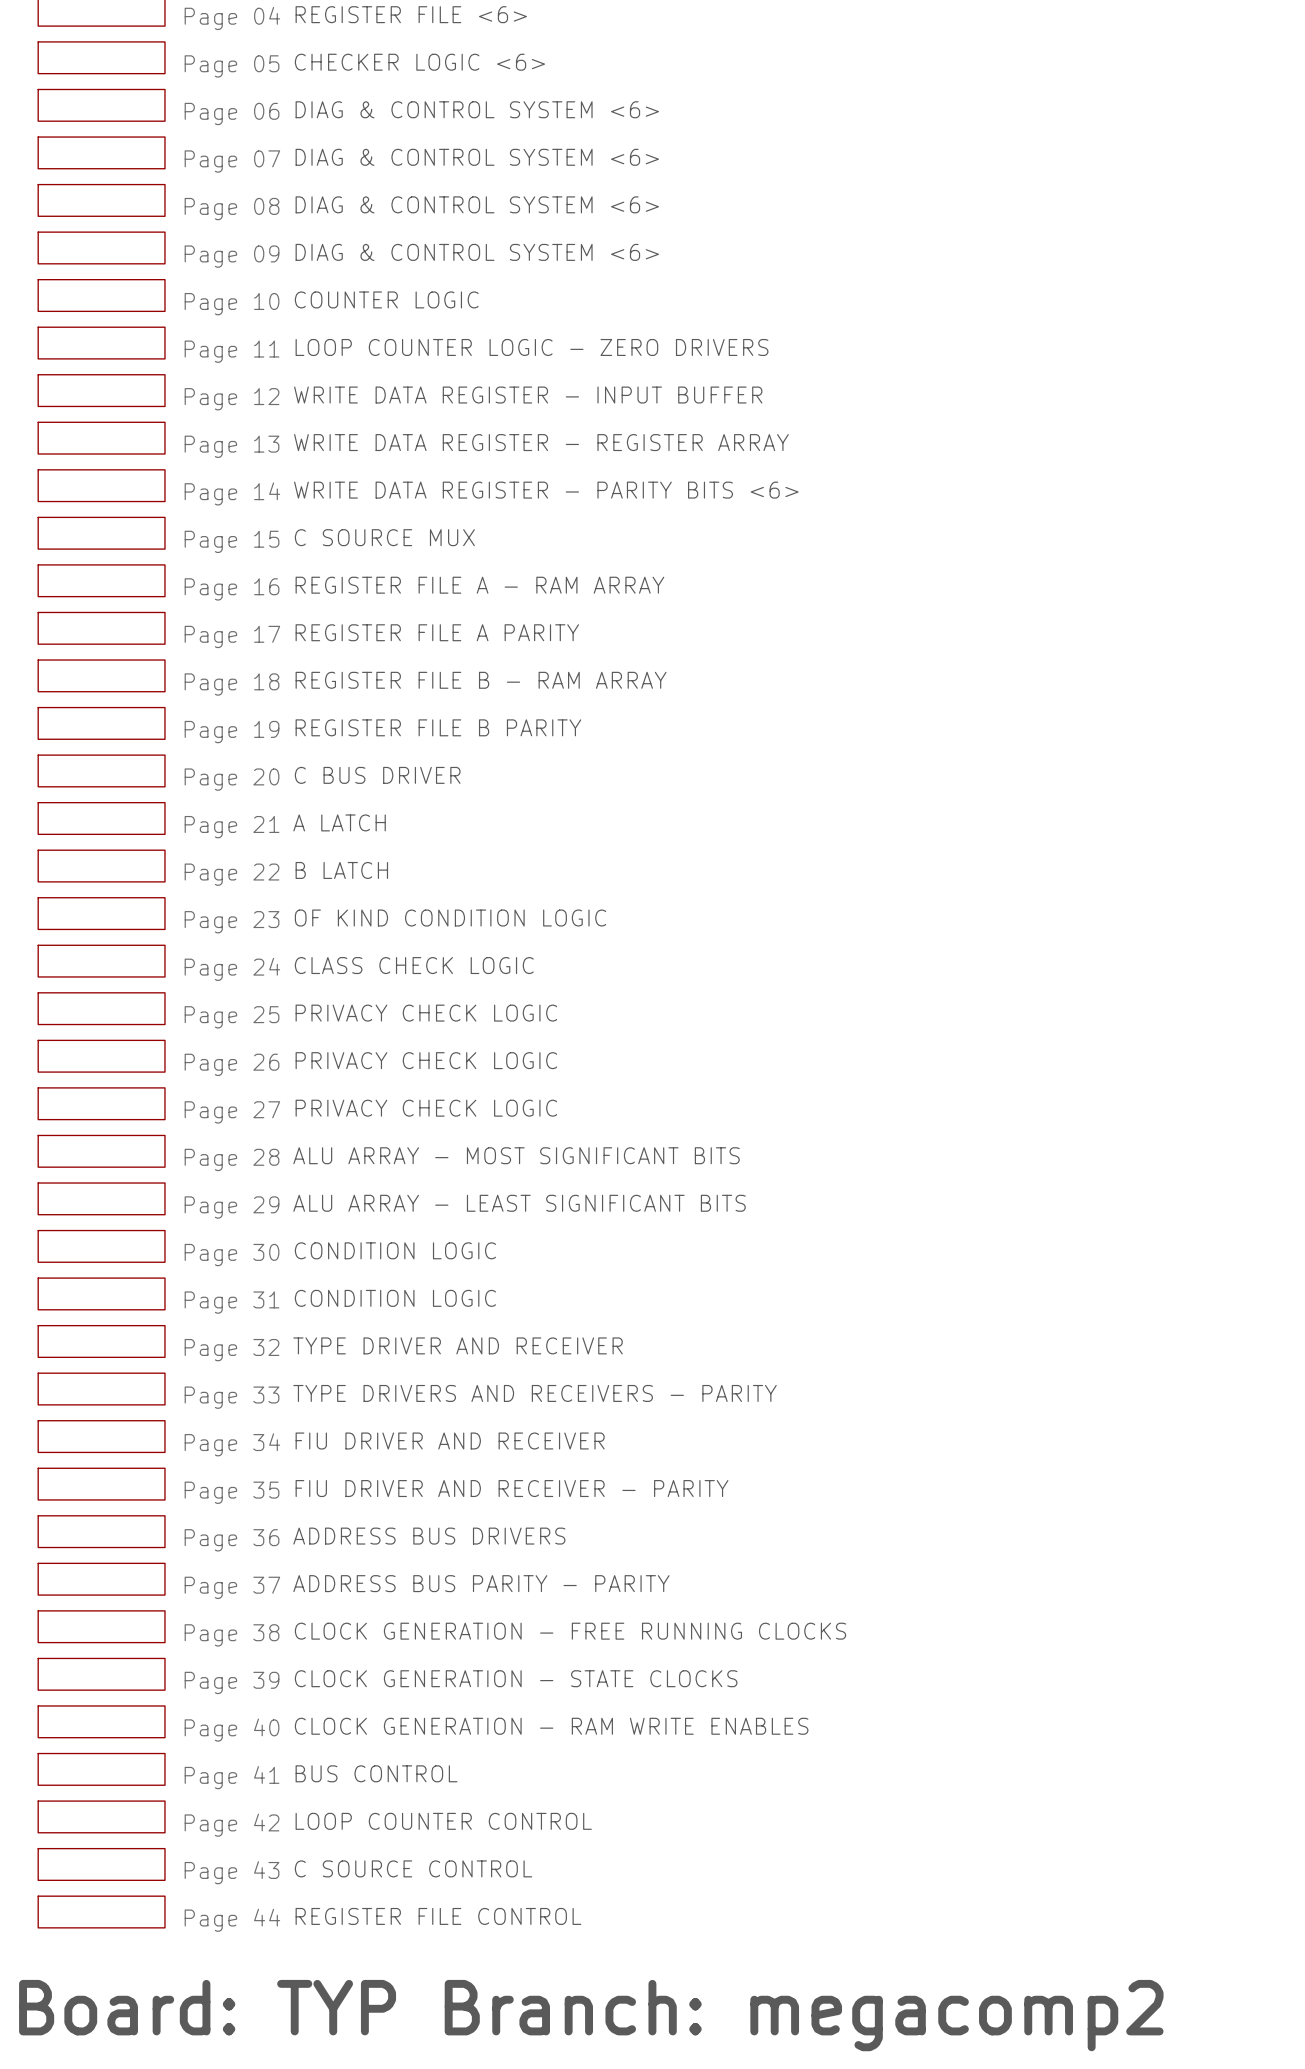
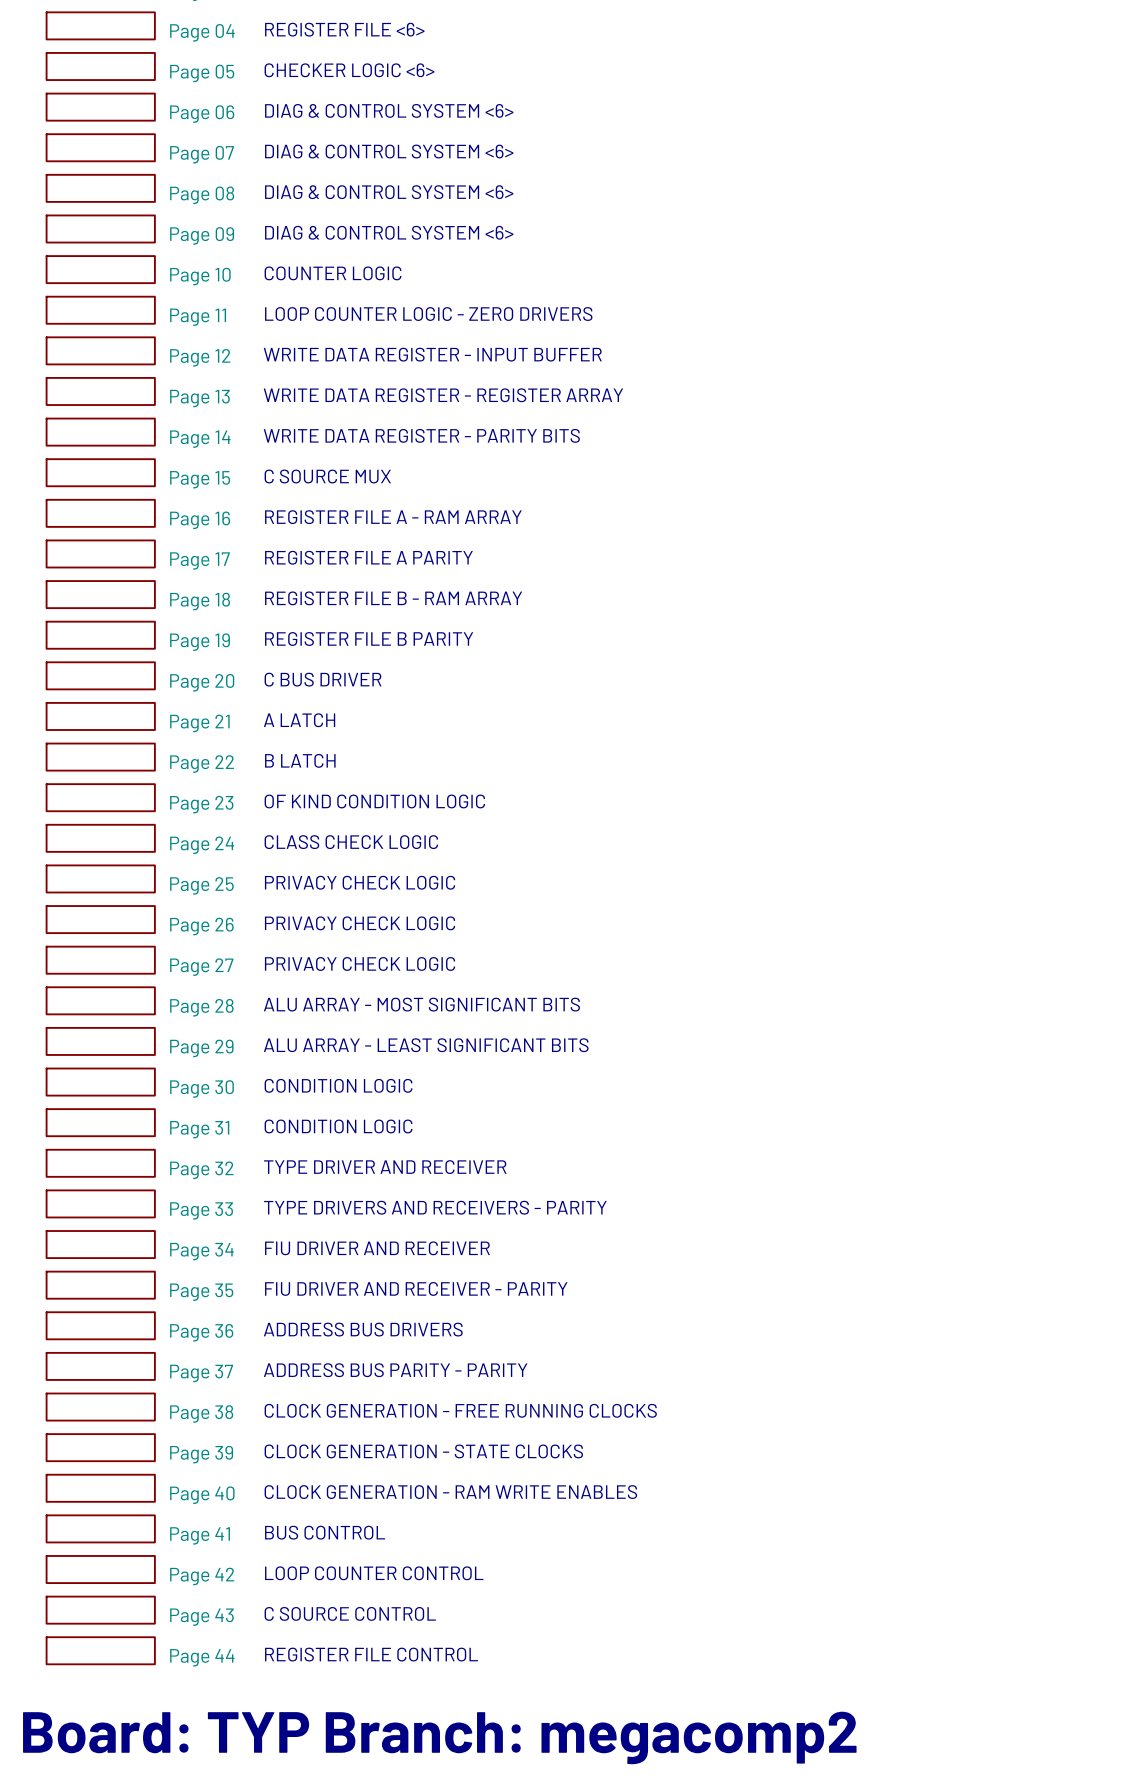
text: WRITE DATA REGISTER - PARITY BITS <6> (546, 490) -> WRITE DATA REGISTER - PARITY BITS (421, 435)

